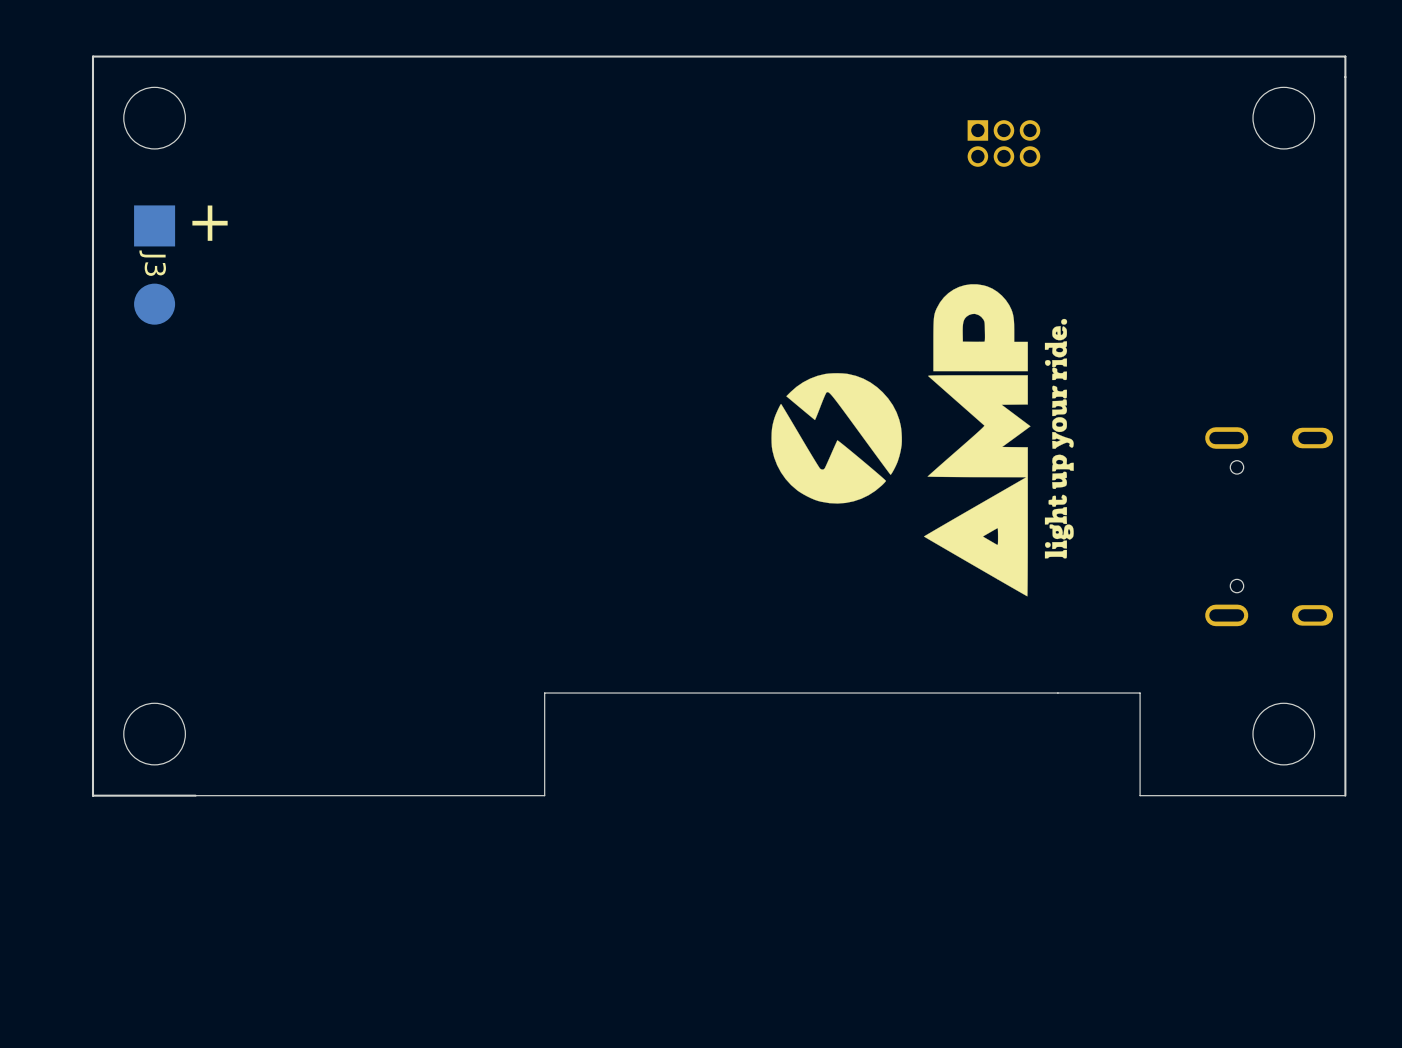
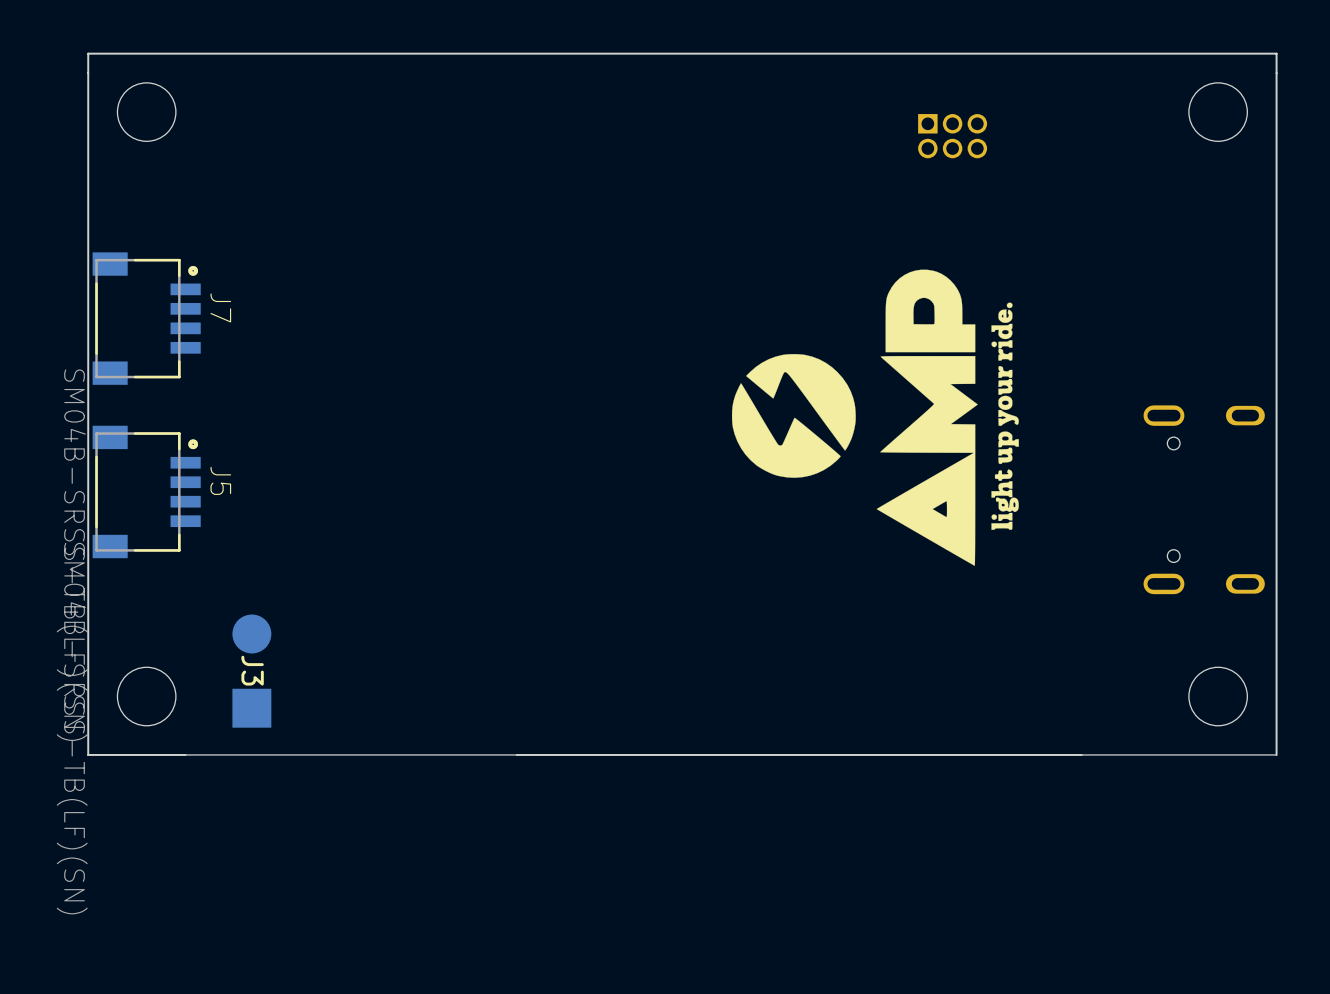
text: + (210, 223) -> none
J3 rotation: 0° (154, 265) -> 180° (251, 671)
J3 position: (154, 265) -> (251, 671)
J7: none -> SM04B-SRSS-TB(LF)(SN) (146, 318)
J5: none -> SM04B-SRSS-TB(LF)(SN) (146, 491)
board edge: (1140, 795) (1140, 693) (544, 693) (544, 795) -> (1081, 754) (516, 754)

